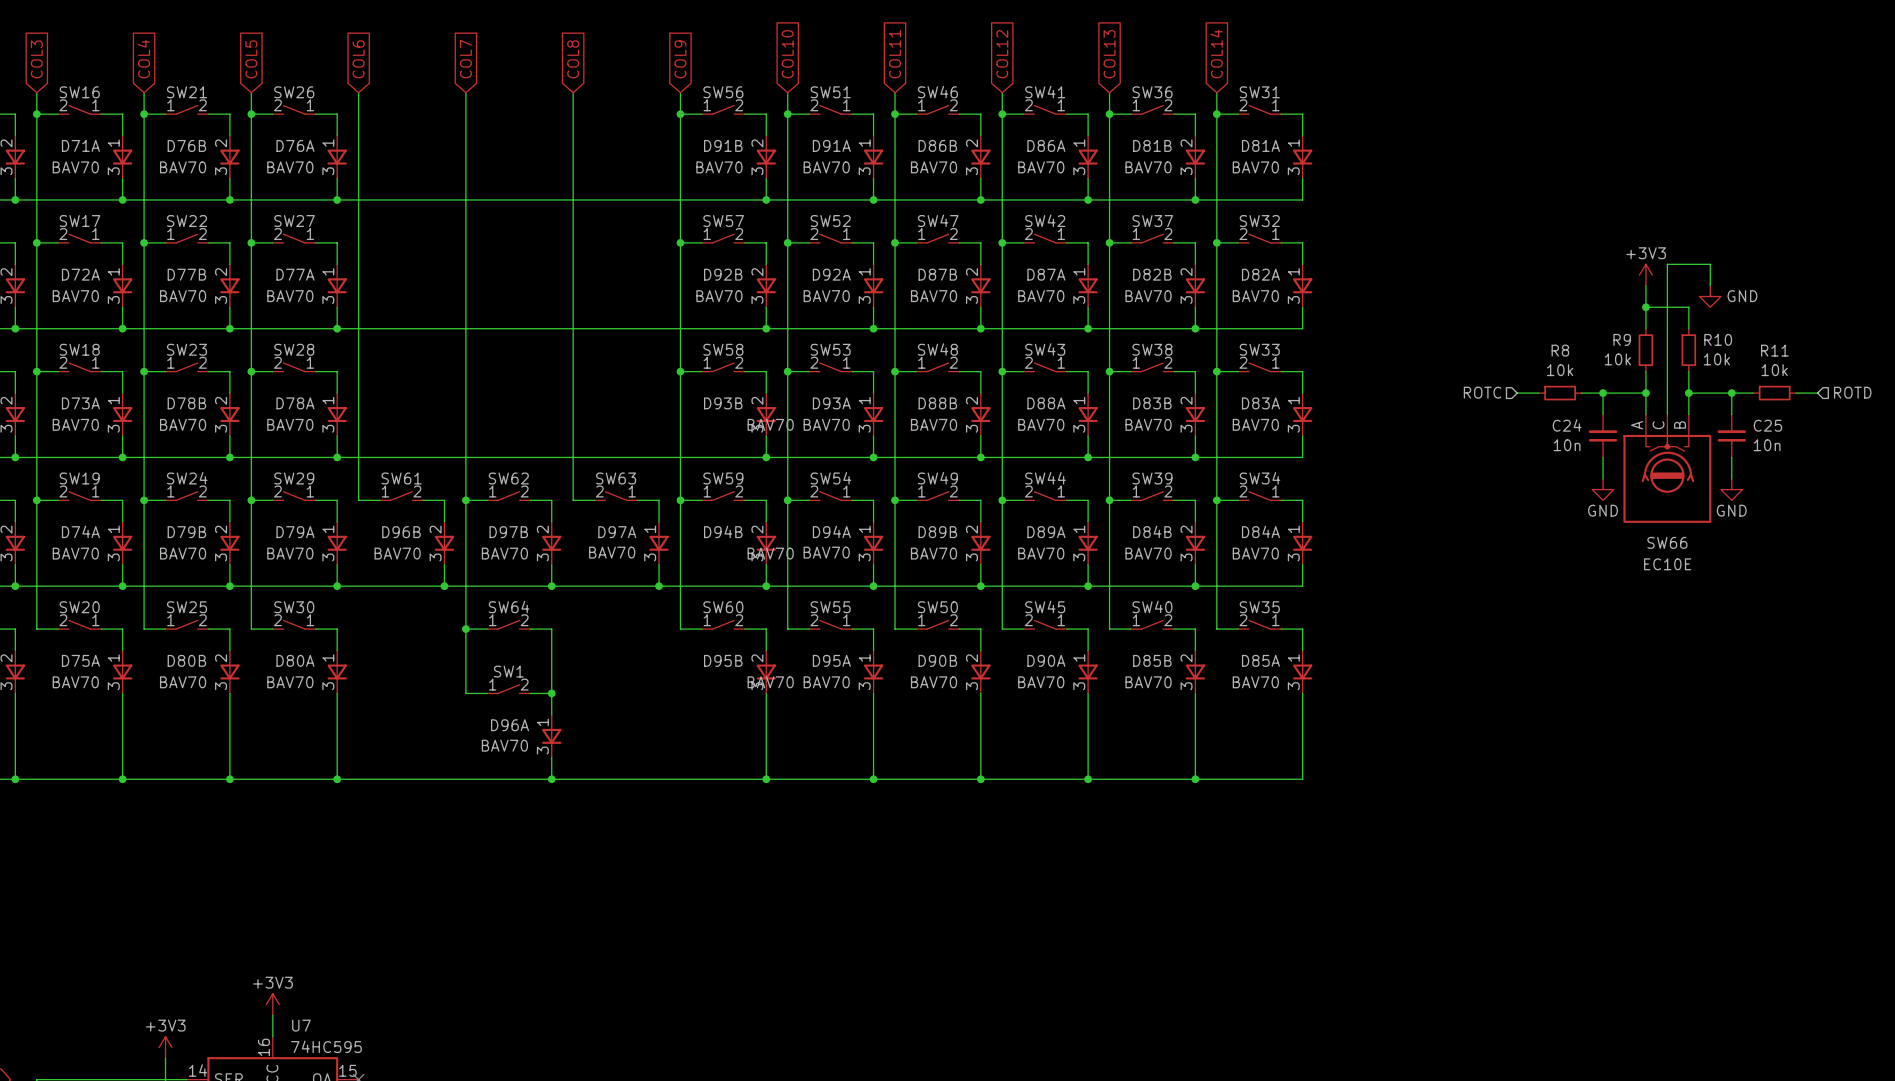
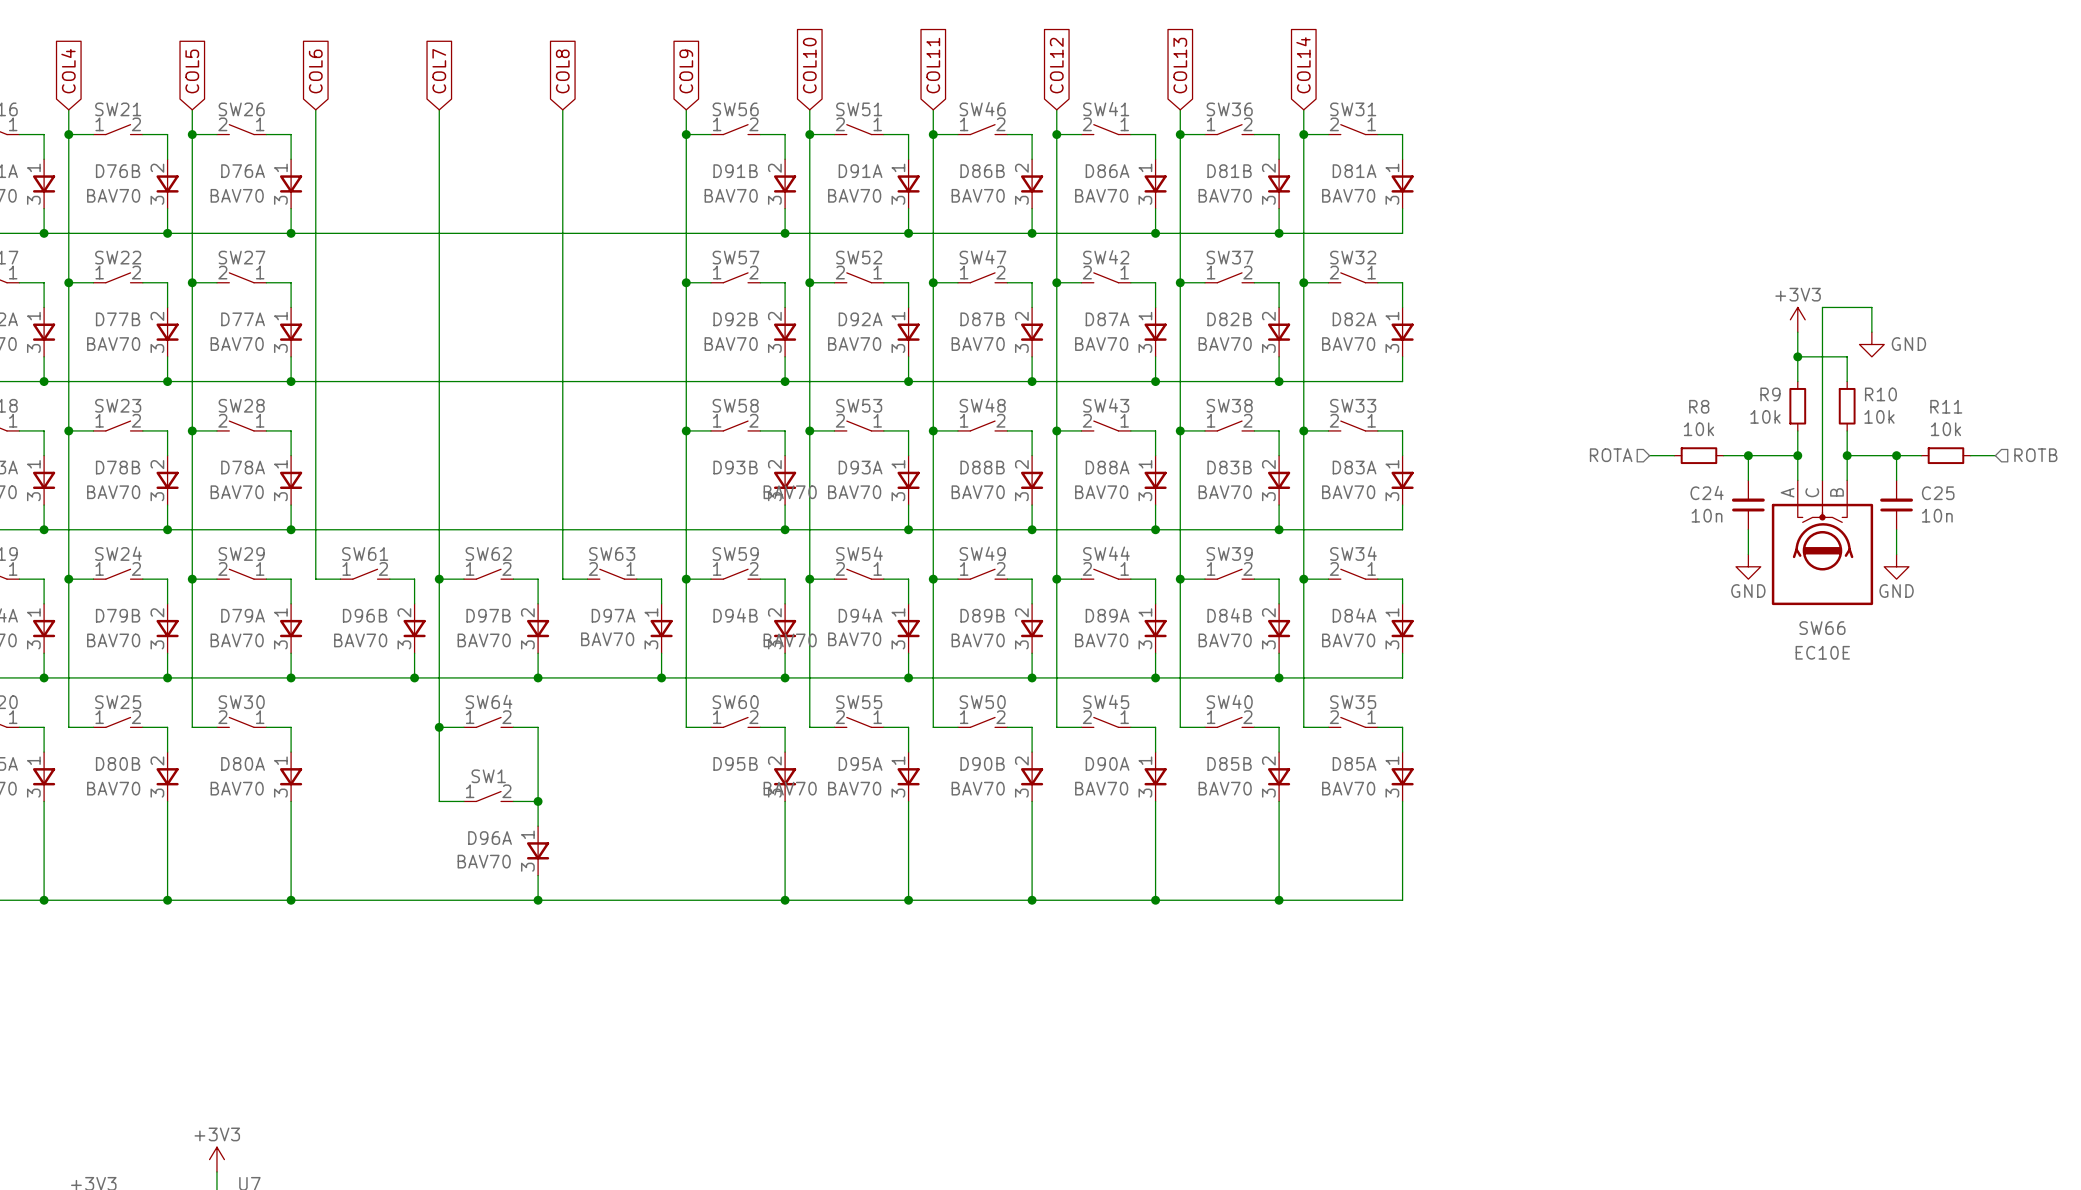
hierarchical label: ROTC (1482, 392) -> ROTA (1611, 455)
hierarchical label: ROTD (1852, 392) -> ROTB (2035, 455)

